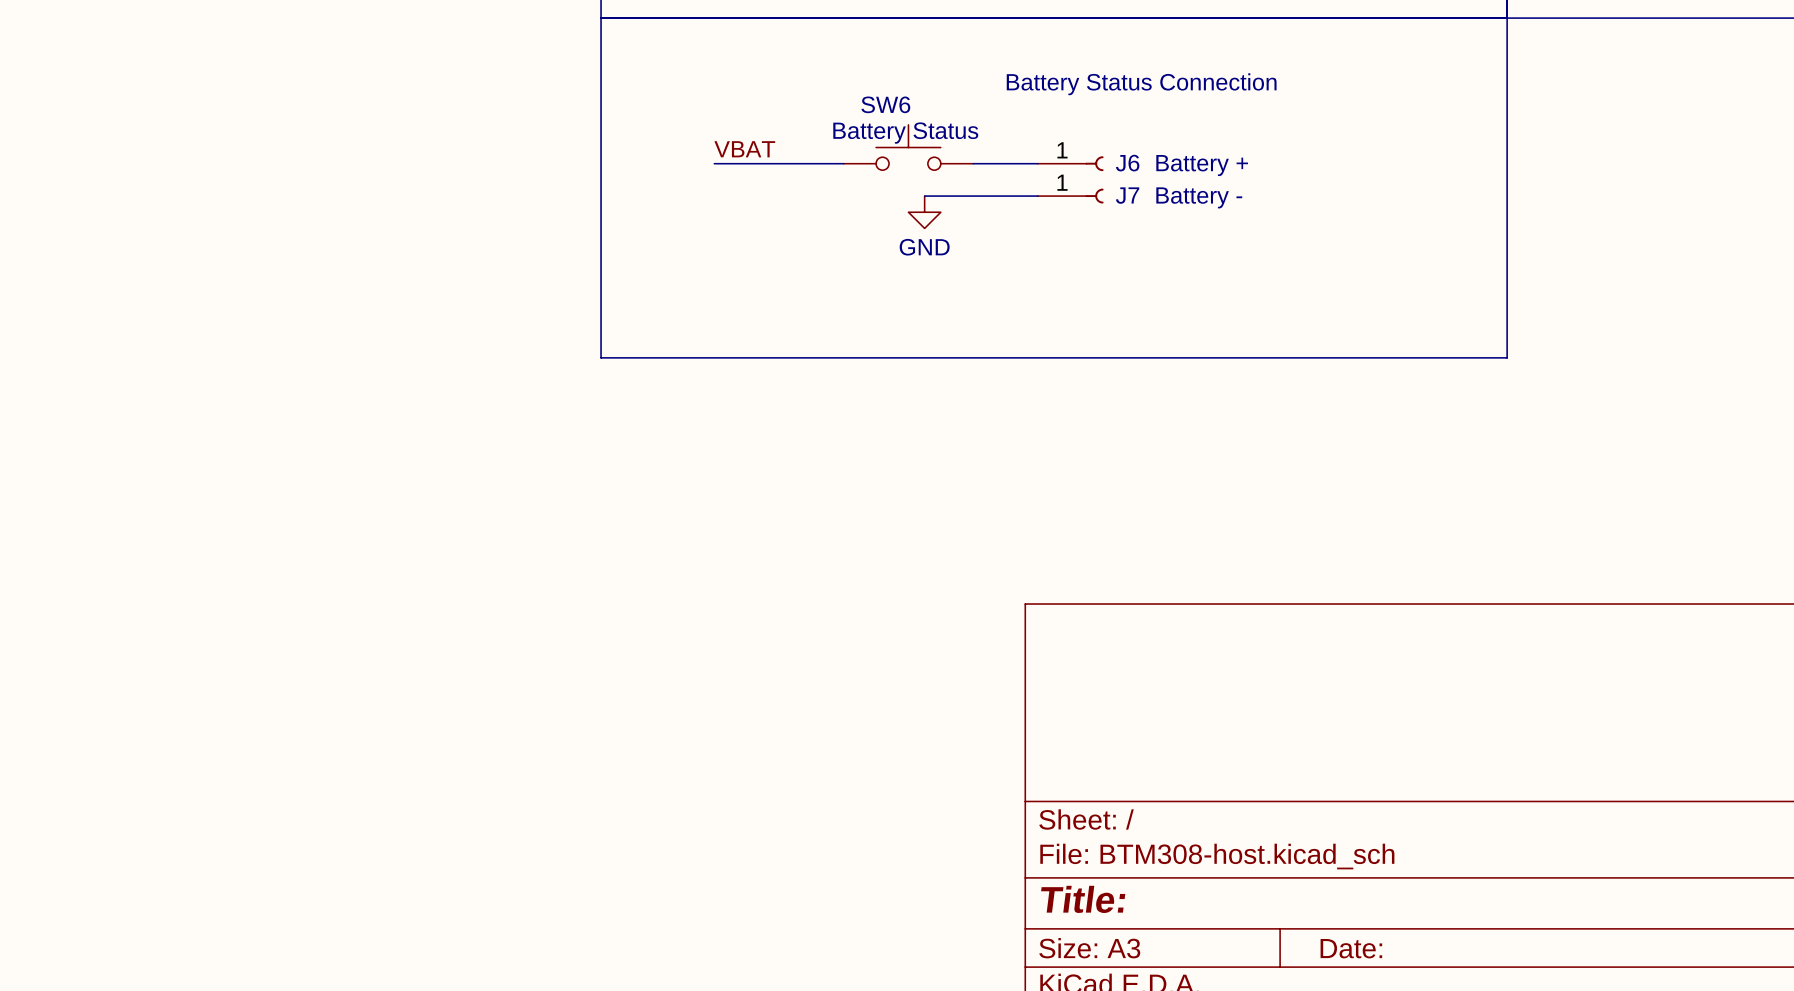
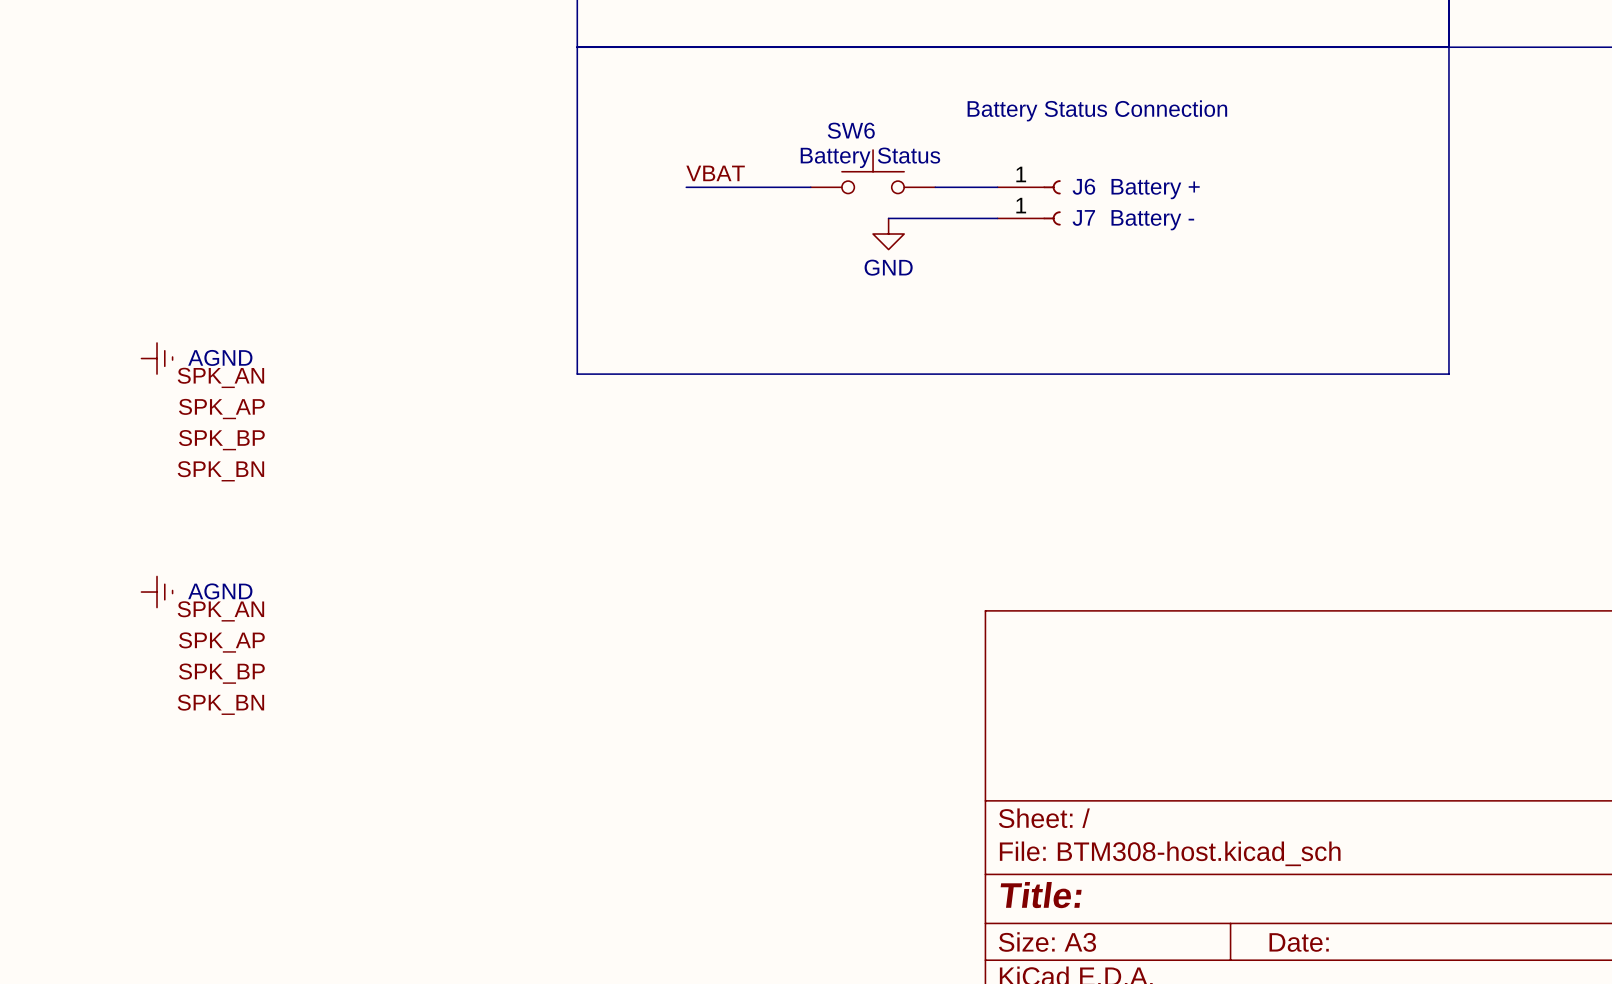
power symbol: none -> AGND (157, 358)
label: none -> SPK_AN (220, 377)
label: none -> SPK_AP (221, 409)
label: none -> SPK_BP (221, 440)
label: none -> SPK_BN (220, 471)
power symbol: none -> AGND (157, 592)
label: none -> SPK_AN (220, 611)
label: none -> SPK_AP (221, 642)
label: none -> SPK_BP (221, 673)
label: none -> SPK_BN (220, 704)

